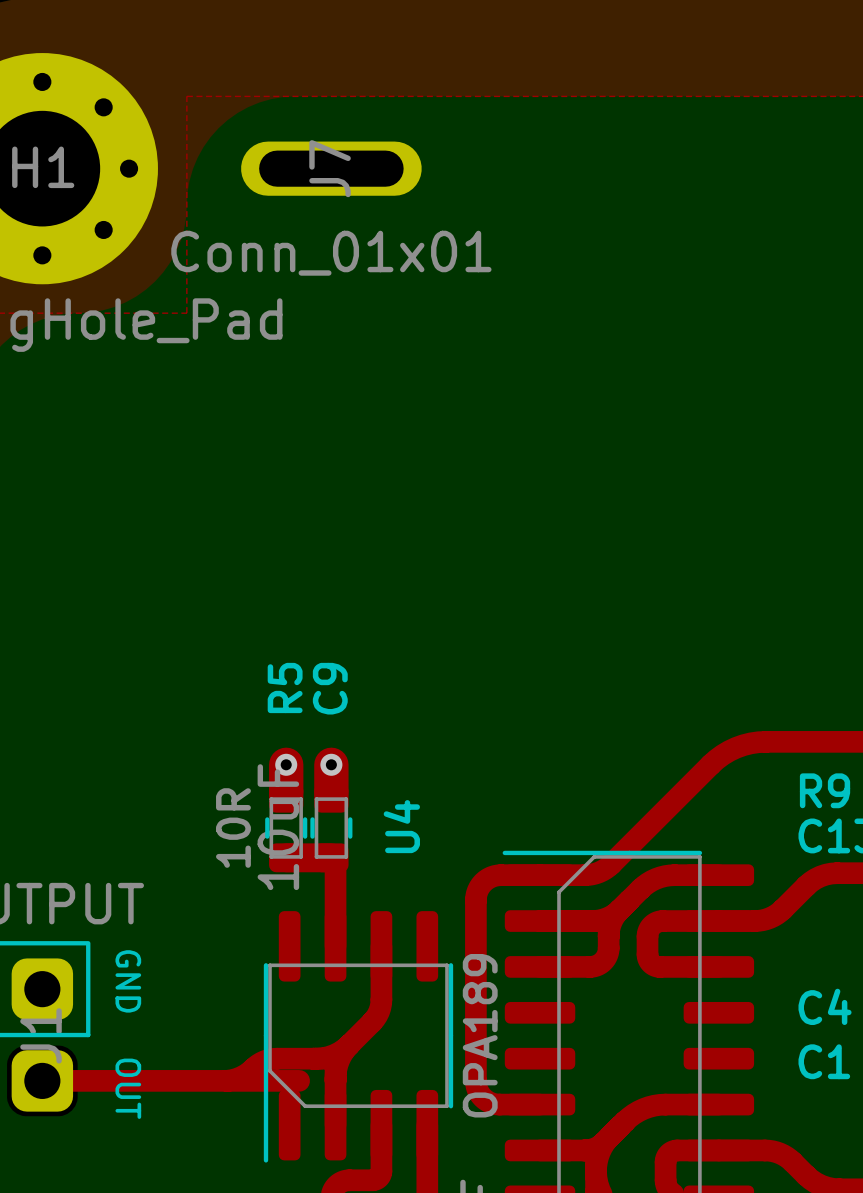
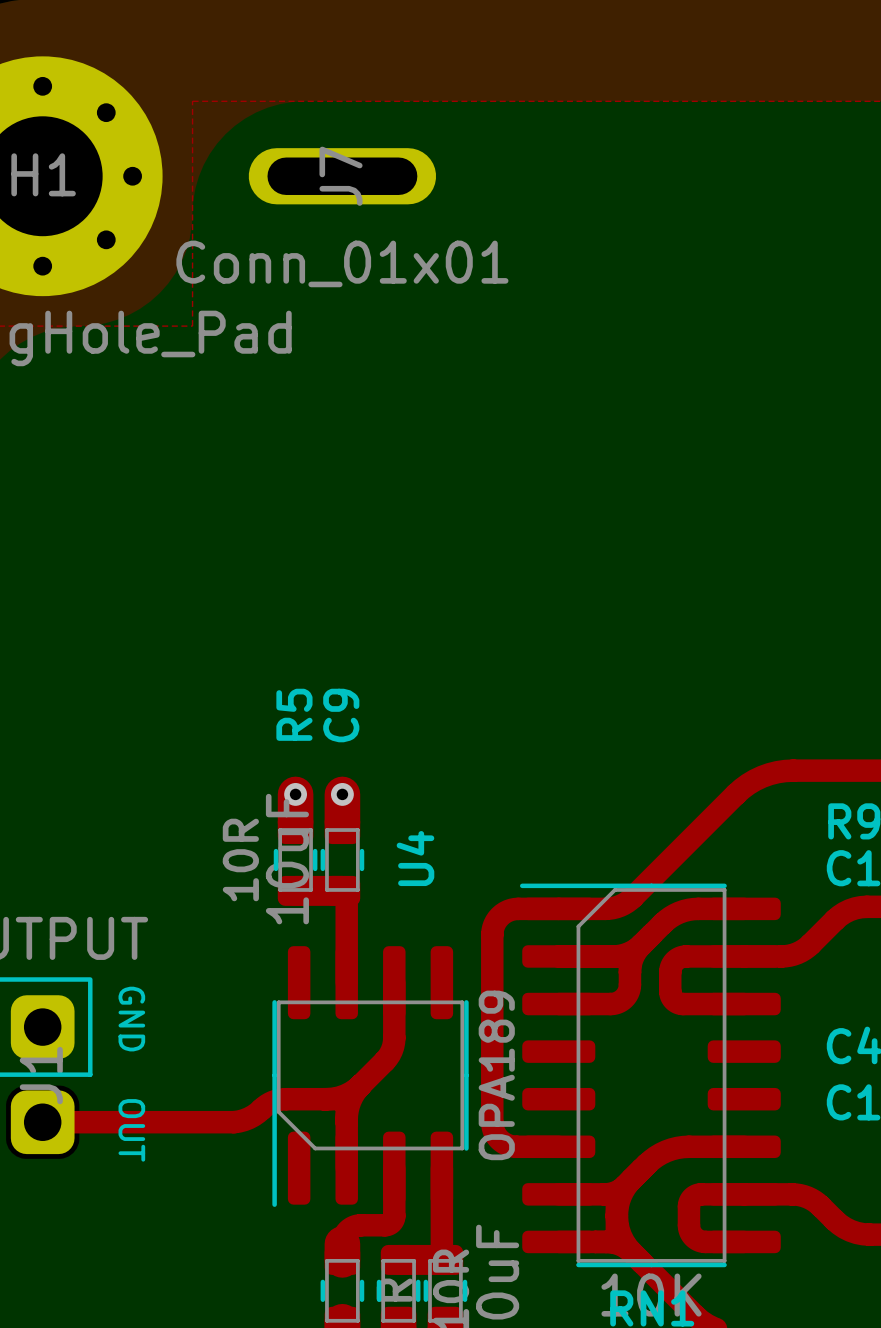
top track: (226, 1080) (299, 1080) -> none

